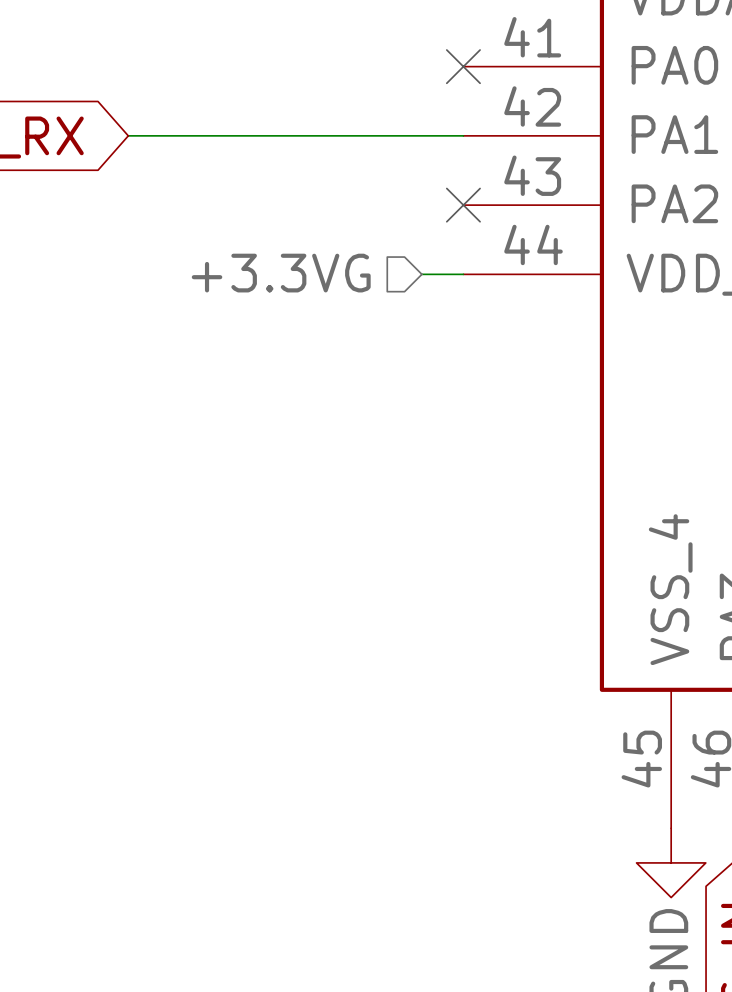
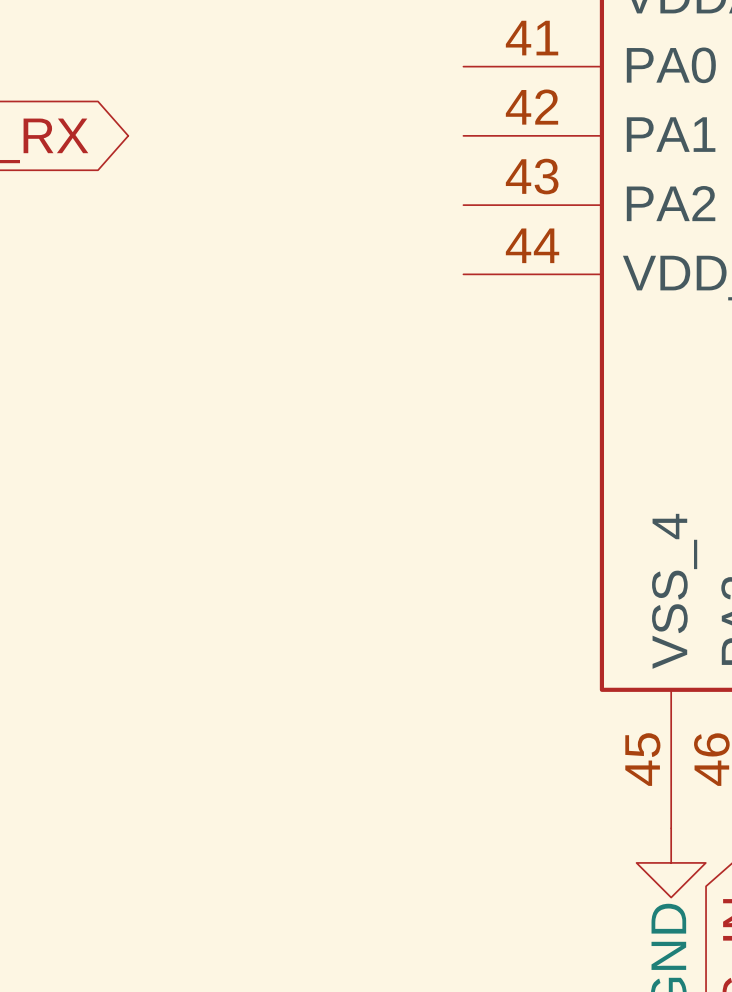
no-connect mark: (463, 66) -> none
wire: (128, 135) (463, 135) -> none
no-connect mark: (463, 205) -> none
hierarchical label: +3.3VG (281, 273) -> none
wire: (421, 274) (463, 274) -> none

